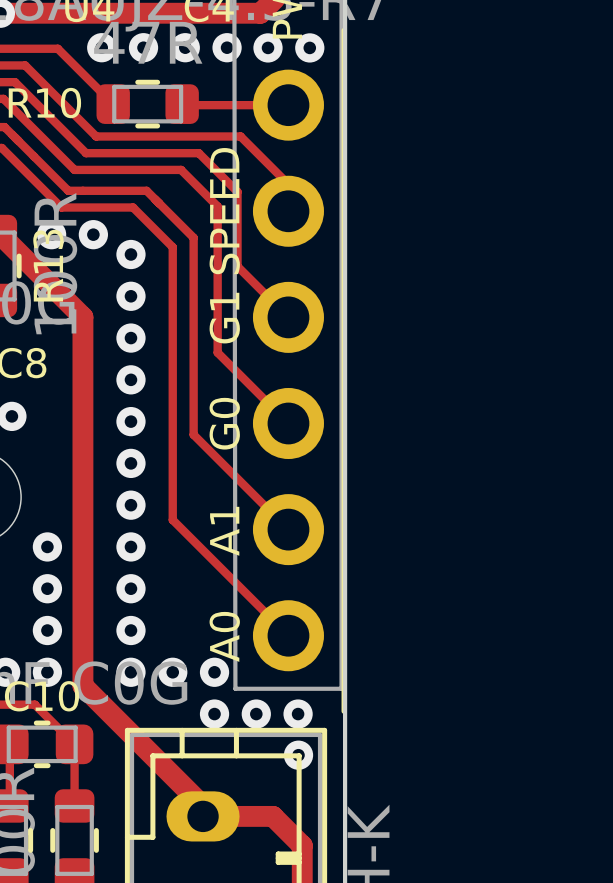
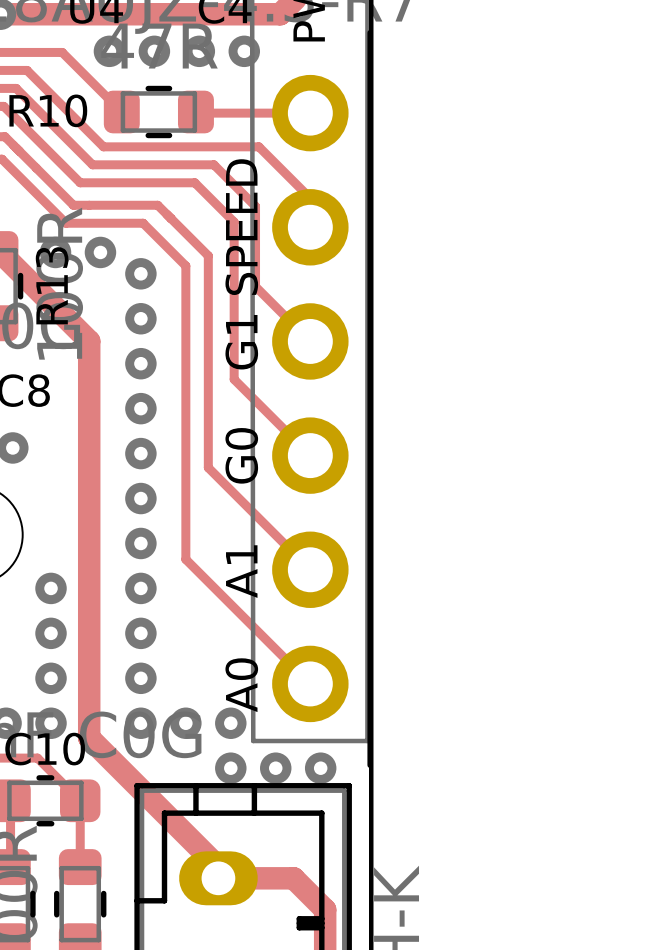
via: (268, 47) -> none
via: (309, 47) -> none
via: (298, 755) -> none

